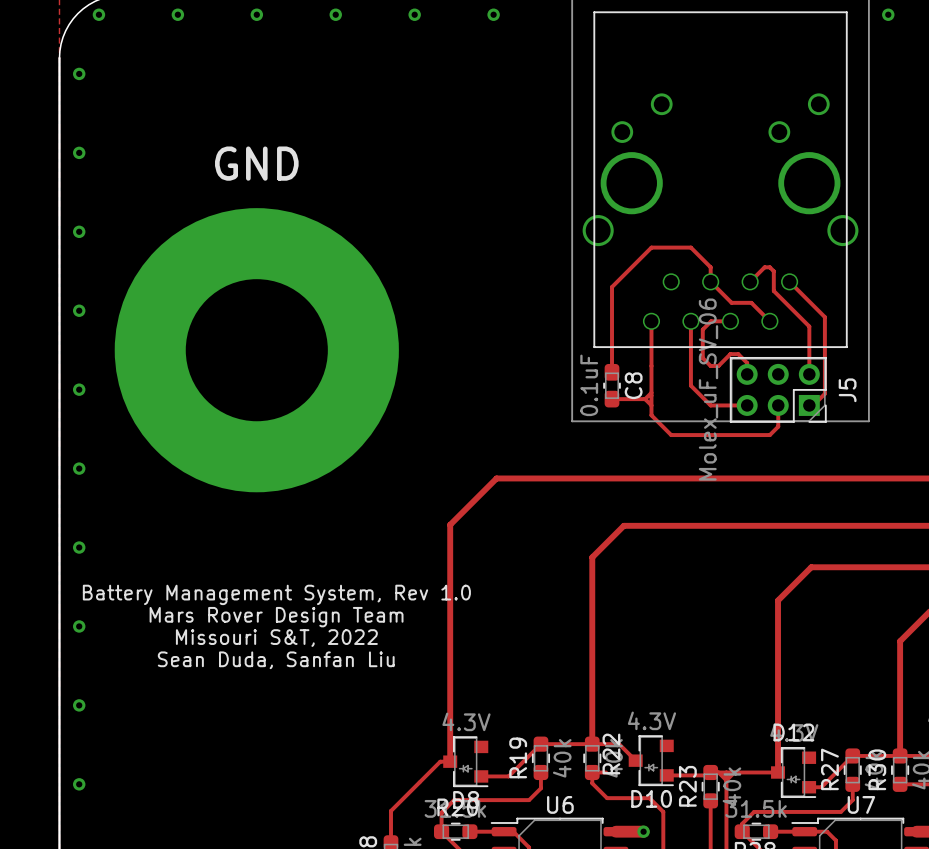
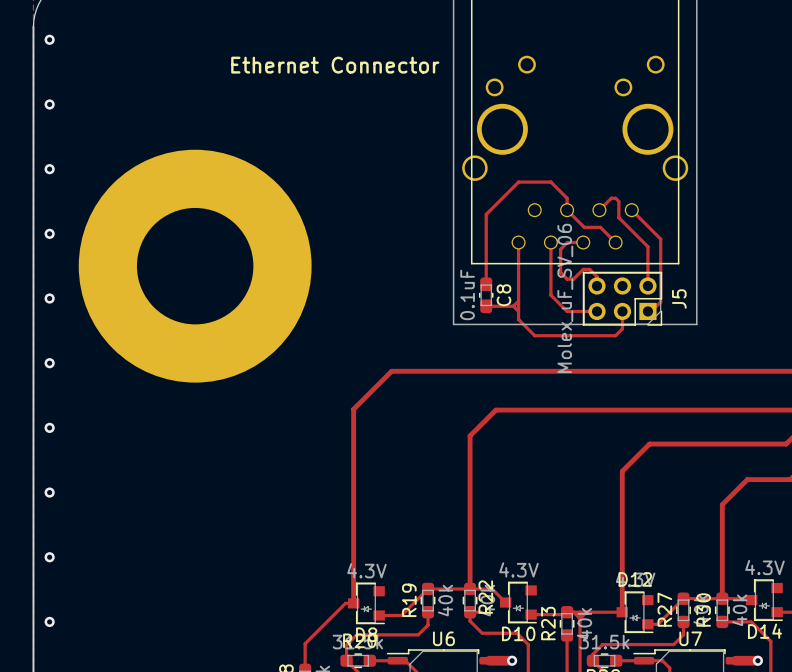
text: none -> Ethernet Connector (335, 65)
text: GND (256, 163) -> none
text: Battery Management System, Rev 1.0 (276, 594) -> none
text: Mars Rover Design Team (276, 617) -> none
text: Missouri S&T, 2022 (276, 638) -> none
text: Sean Duda, Sanfan Liu (276, 660) -> none

